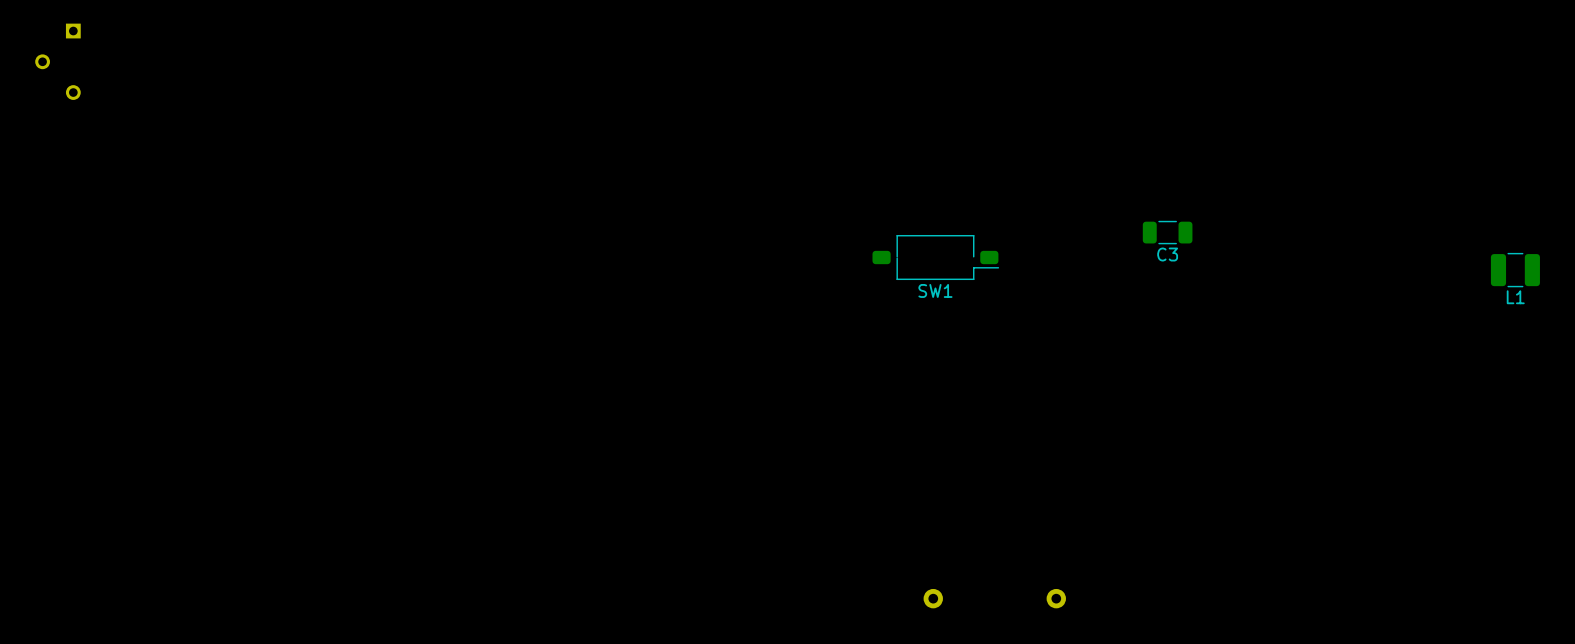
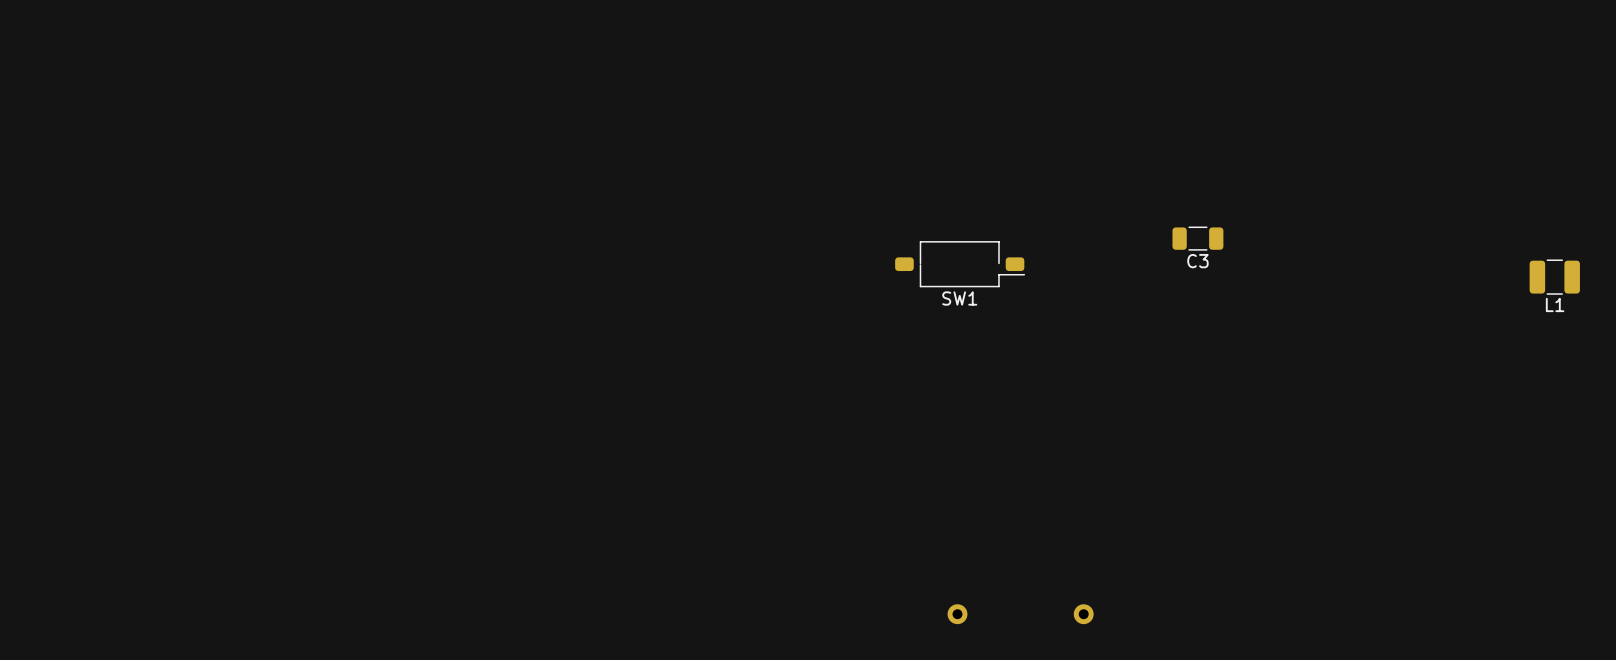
part: (57, 61) -> none

